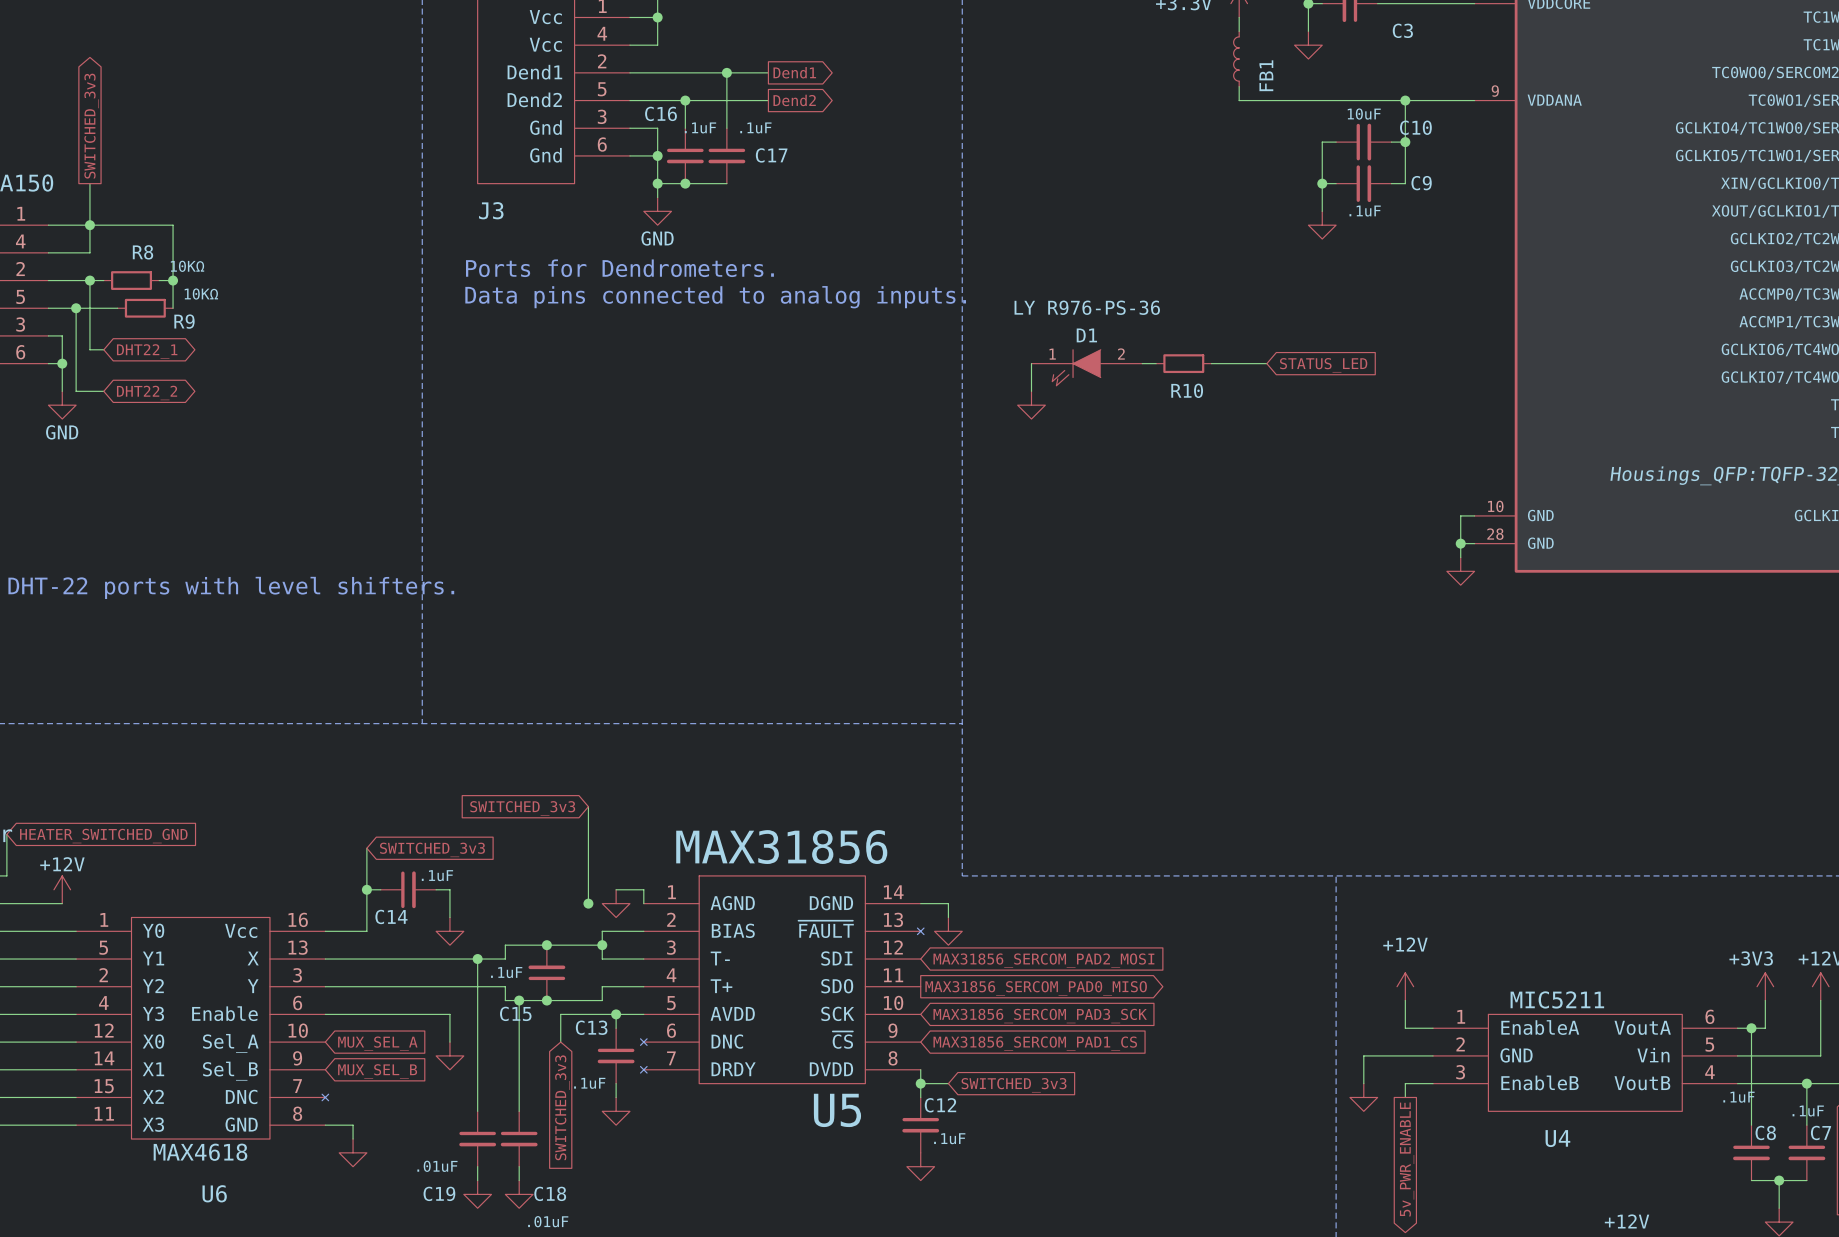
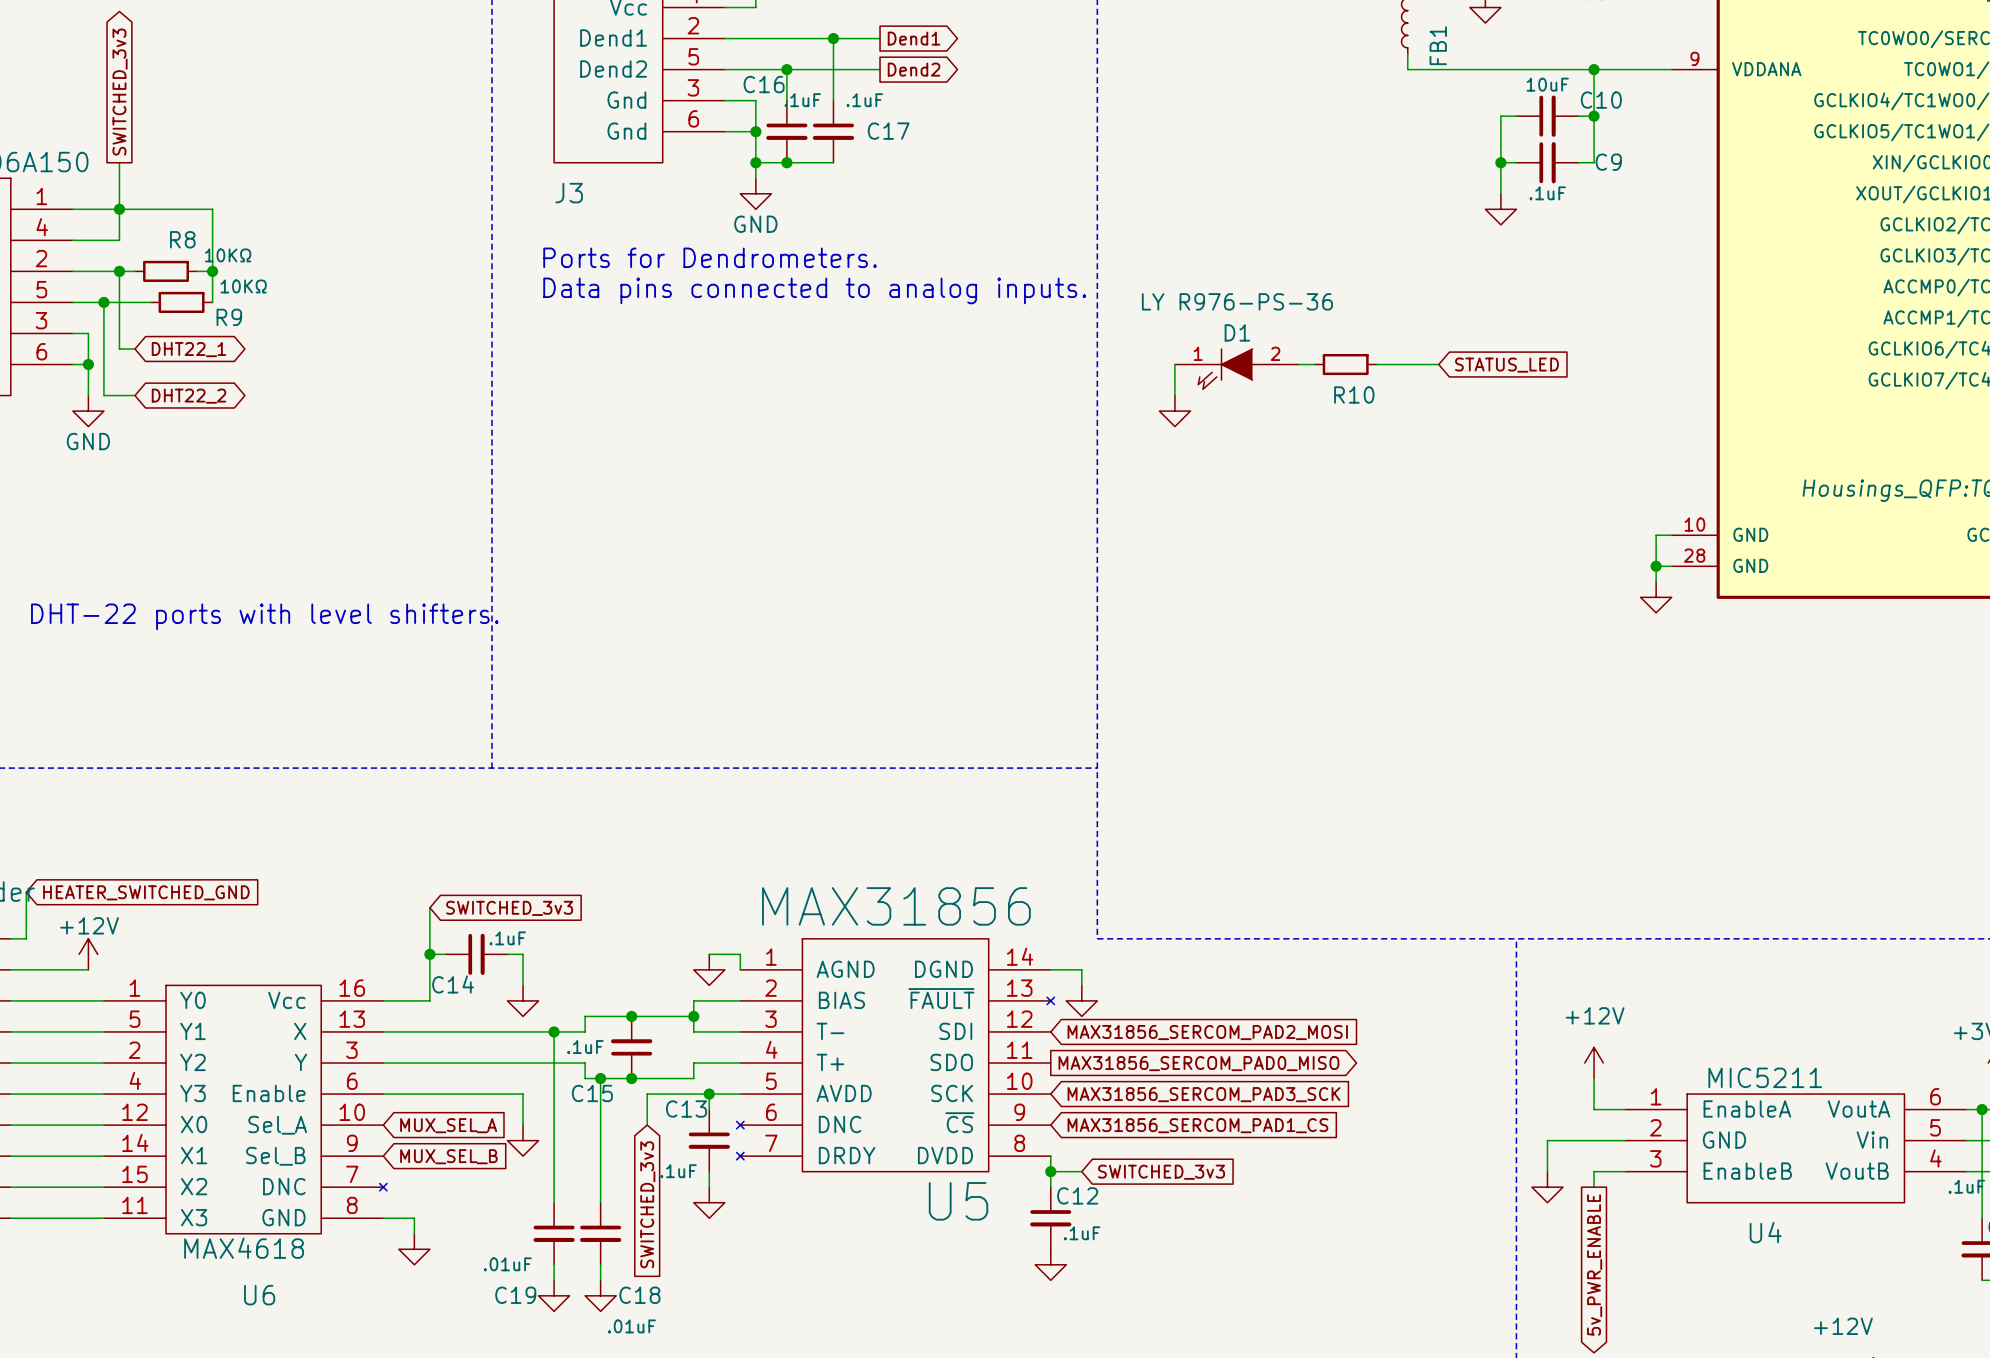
wire: (588, 806) (588, 903) -> none
global label: SWITCHED_3v3 (522, 808) -> none
junction: (588, 903) -> none

